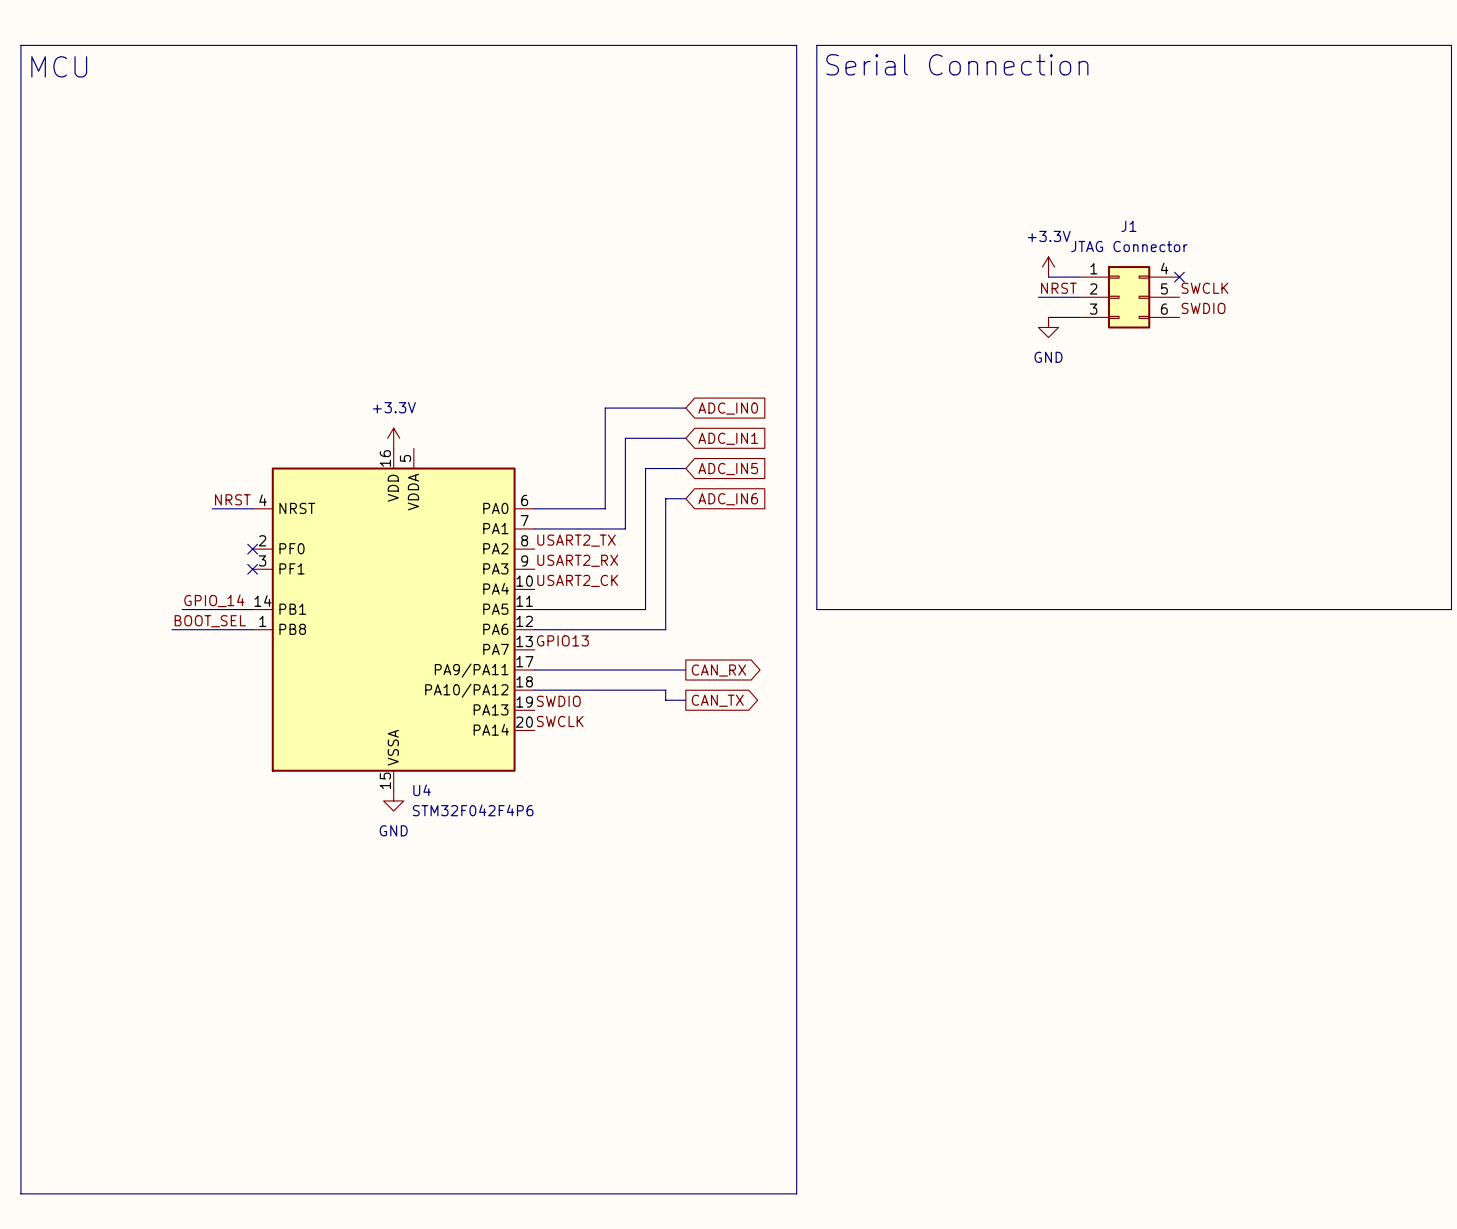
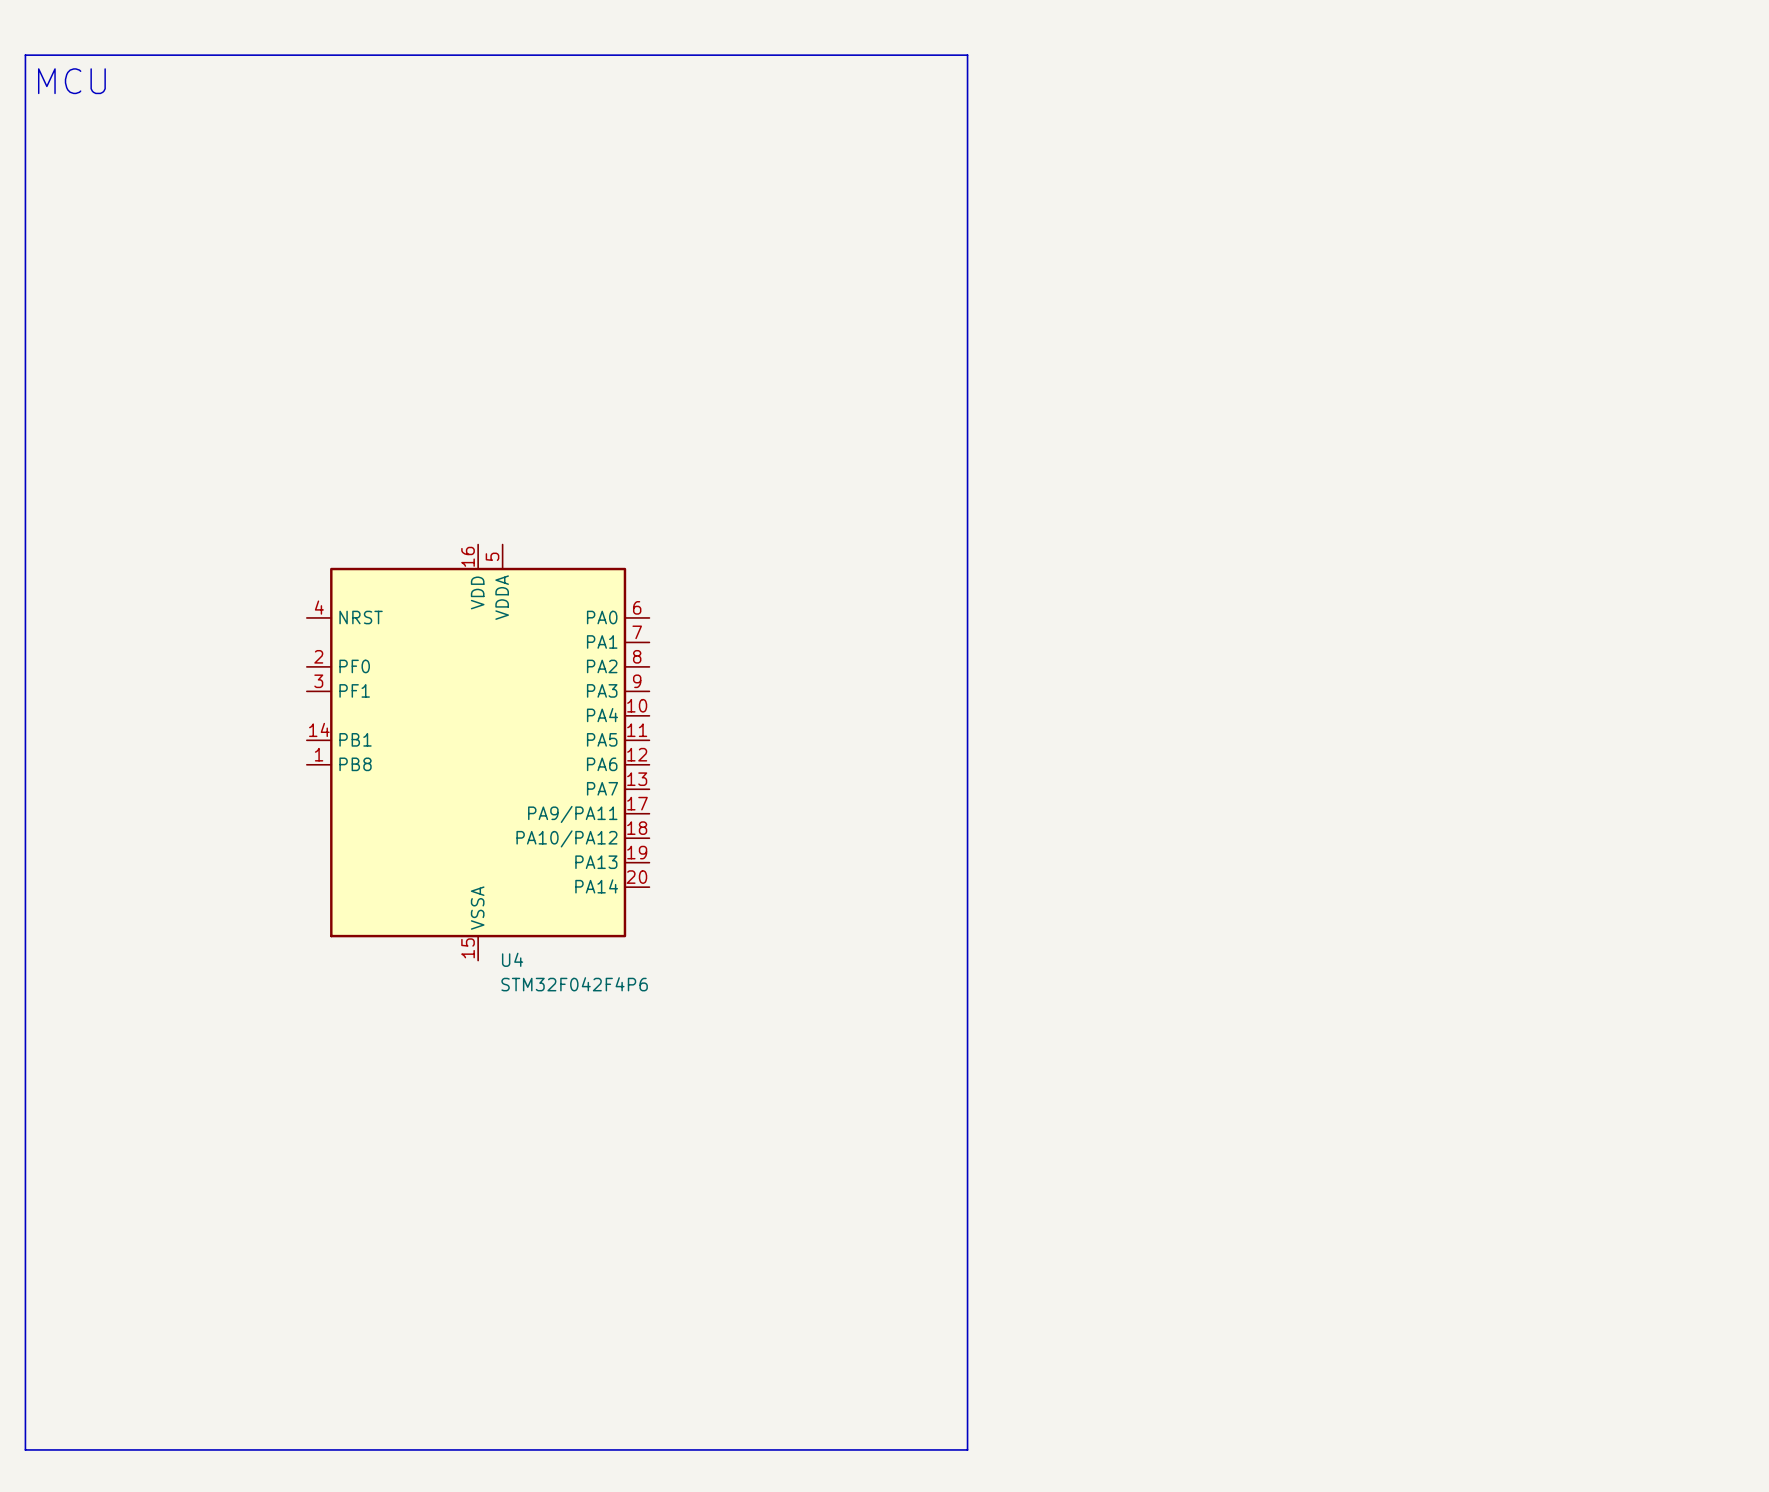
line: (816, 45) (1451, 45) (1451, 609) (816, 609) (816, 45) -> none
text: Serial Connection (957, 64) -> none
power symbol: +3.3V (1048, 267) -> none
wire: (1048, 277) (1078, 277) -> none
no-connect mark: (1179, 277) -> none
label: NRST (1058, 288) -> none
label: SWCLK (1204, 288) -> none
wire: (1038, 297) (1078, 297) -> none
J1: JTAG Connector (1129, 297) -> none
label: SWDIO (1203, 308) -> none
wire: (1048, 317) (1078, 317) -> none
power symbol: GND (1048, 327) -> none
wire: (685, 408) (605, 408) (605, 508) (534, 508) -> none
global label: ADC_IN0 (728, 408) -> none
power symbol: +3.3V (393, 438) -> none
wire: (685, 438) (625, 438) (625, 528) (534, 528) -> none
global label: ADC_IN1 (728, 438) -> none
wire: (685, 468) (645, 468) (645, 609) (534, 609) -> none
global label: ADC_IN5 (728, 469) -> none
wire: (685, 498) (665, 498) (665, 629) (534, 629) -> none
label: NRST (232, 499) -> none
global label: ADC_IN6 (728, 499) -> none
wire: (212, 508) (252, 508) -> none
label: USART2_TX (576, 540) -> none
no-connect mark: (252, 549) -> none
label: USART2_RX (577, 560) -> none
no-connect mark: (252, 569) -> none
label: USART2_CK (577, 580) -> none
label: GPIO_14 (214, 600) -> none
wire: (182, 609) (252, 609) -> none
label: BOOT_SEL (210, 621) -> none
wire: (172, 629) (252, 629) -> none
label: GPIO13 (562, 640) -> none
wire: (534, 670) (685, 670) -> none
global label: CAN_RX (718, 670) -> none
wire: (534, 690) (665, 690) (665, 700) (685, 700) -> none
global label: CAN_TX (717, 700) -> none
label: SWDIO (558, 701) -> none
label: SWCLK (560, 721) -> none
power symbol: GND (393, 800) -> none

